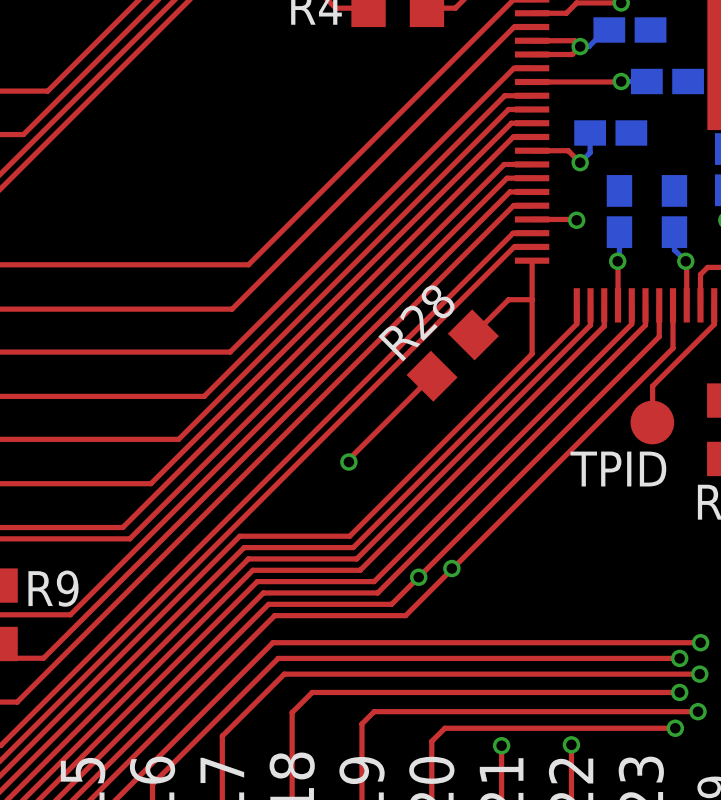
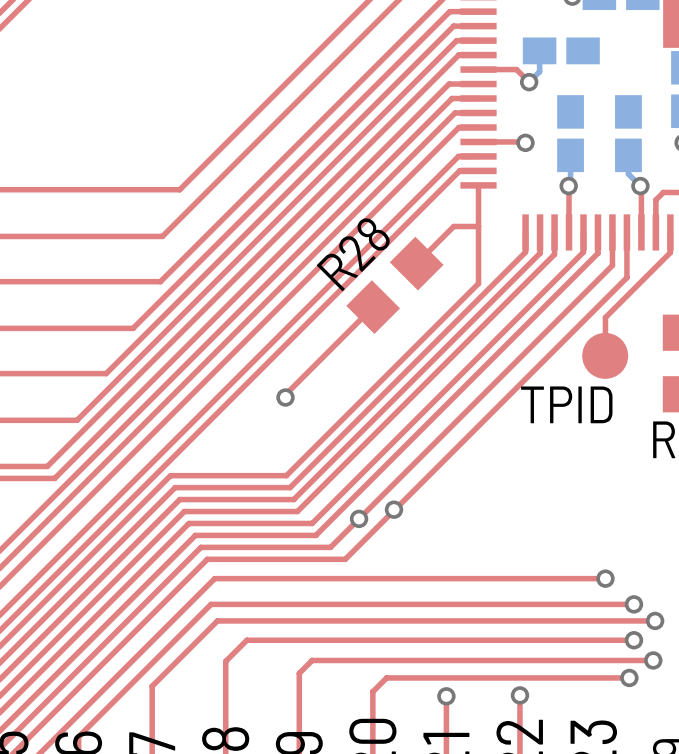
top track: (272, 642) (700, 642) -> (205, 587) (214, 578) (605, 578)
via position: (700, 642) -> (605, 578)

